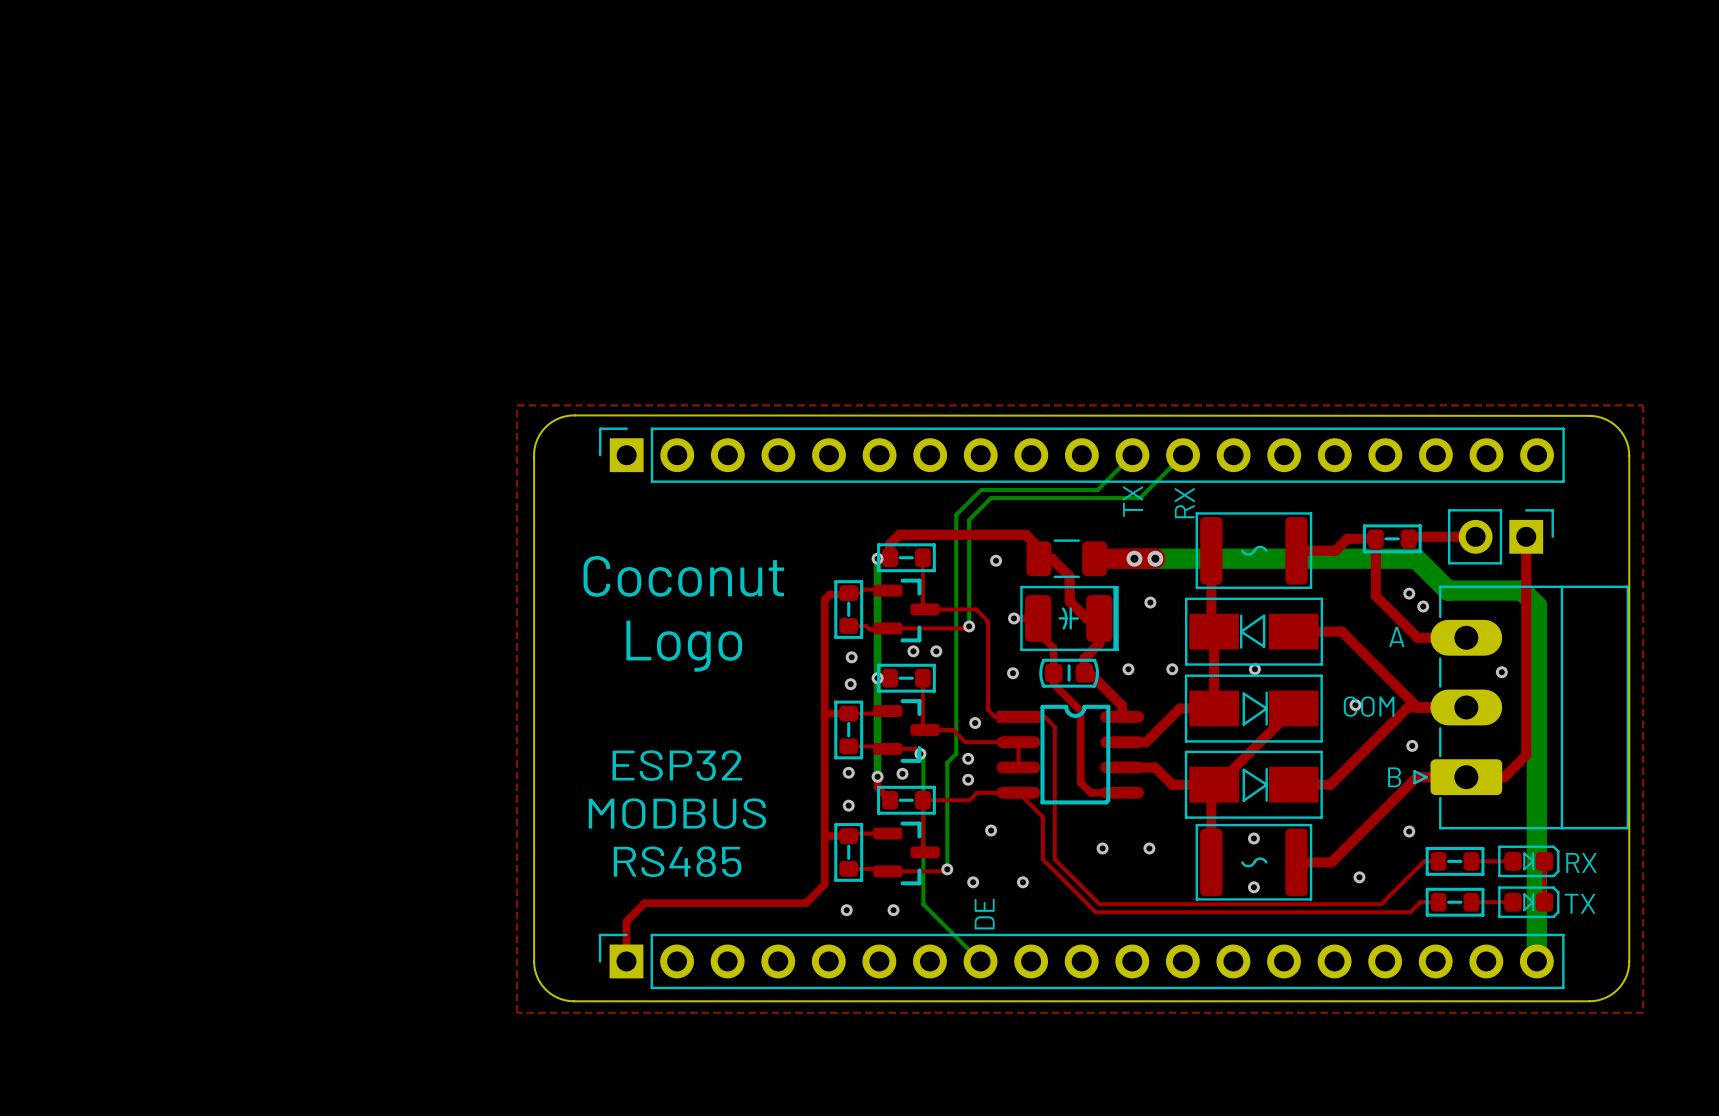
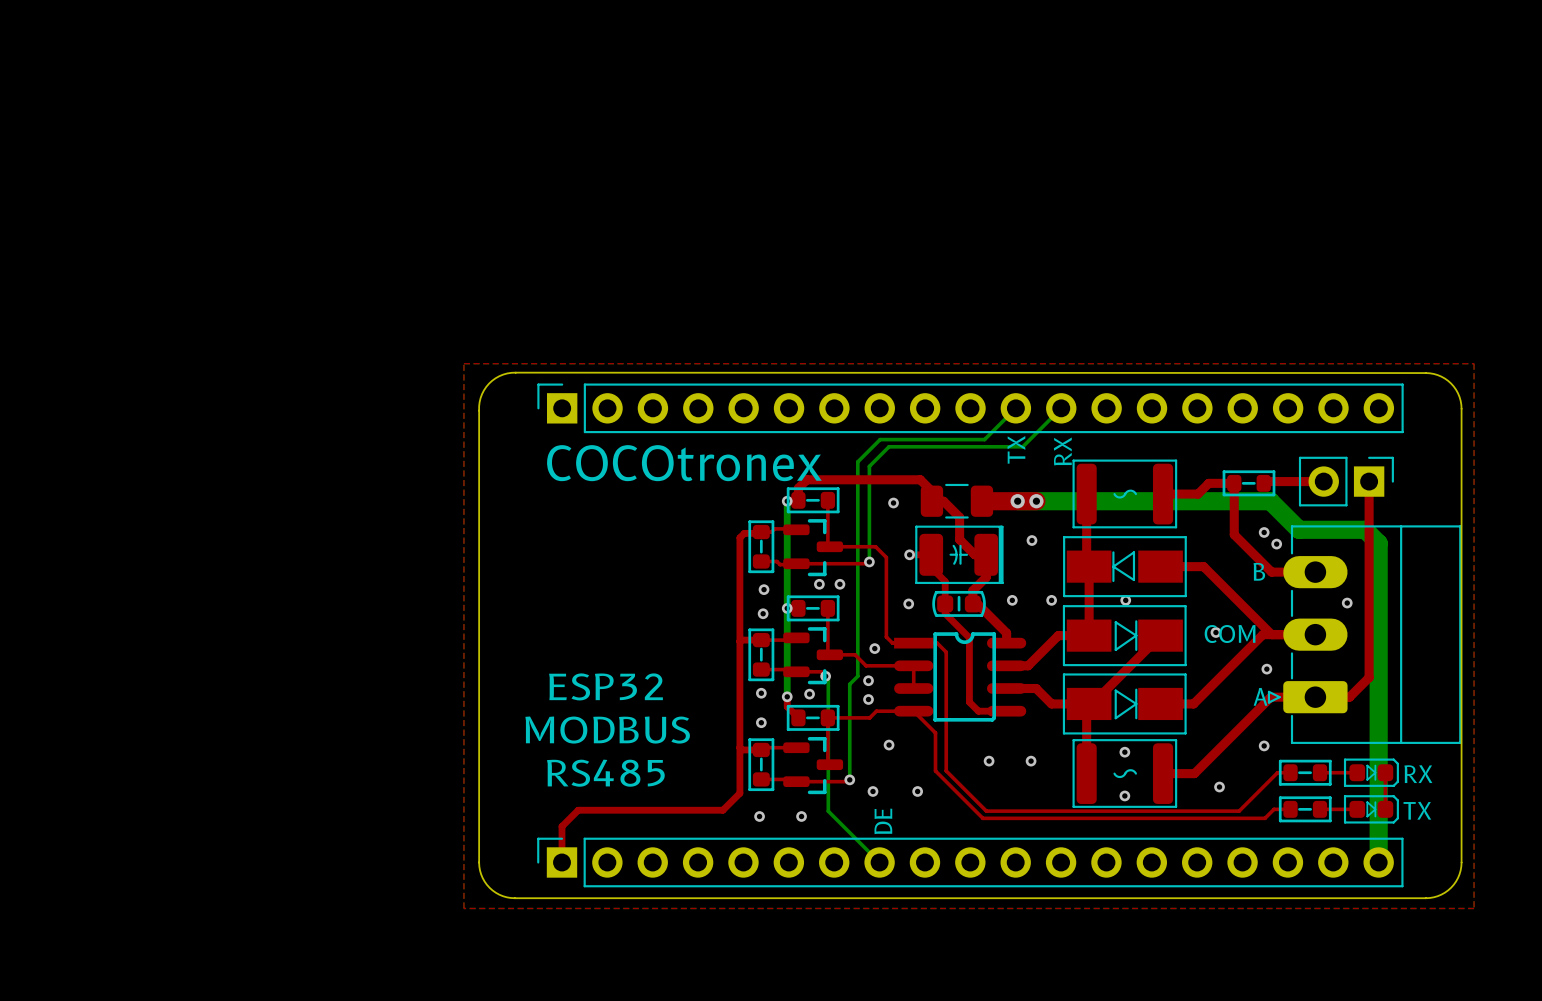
text: none -> COCOtronex (684, 463)
text: Coconut (683, 576) -> none
text: A (1396, 636) -> B (1259, 571)
text: Logo (684, 646) -> none
text: B (1394, 777) -> A (1260, 696)

